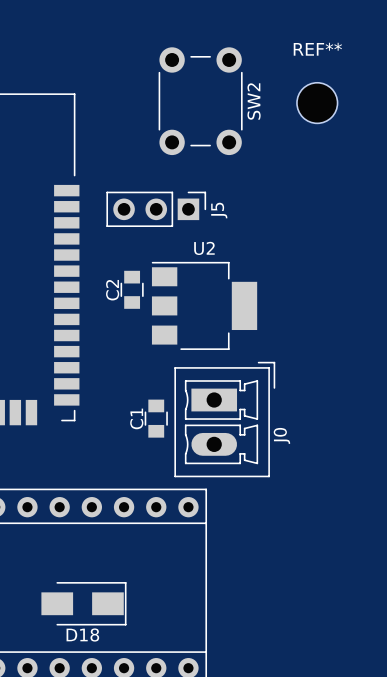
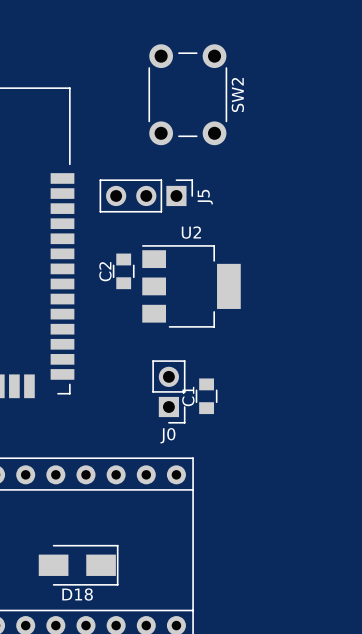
REF**: (317, 103) -> none
J0 footprint: [174, 361, 276, 478] -> [152, 360, 186, 424]
C1 position: (156, 418) -> (206, 396)
J0 name position: J0 (281, 435) -> J0 (167, 435)

